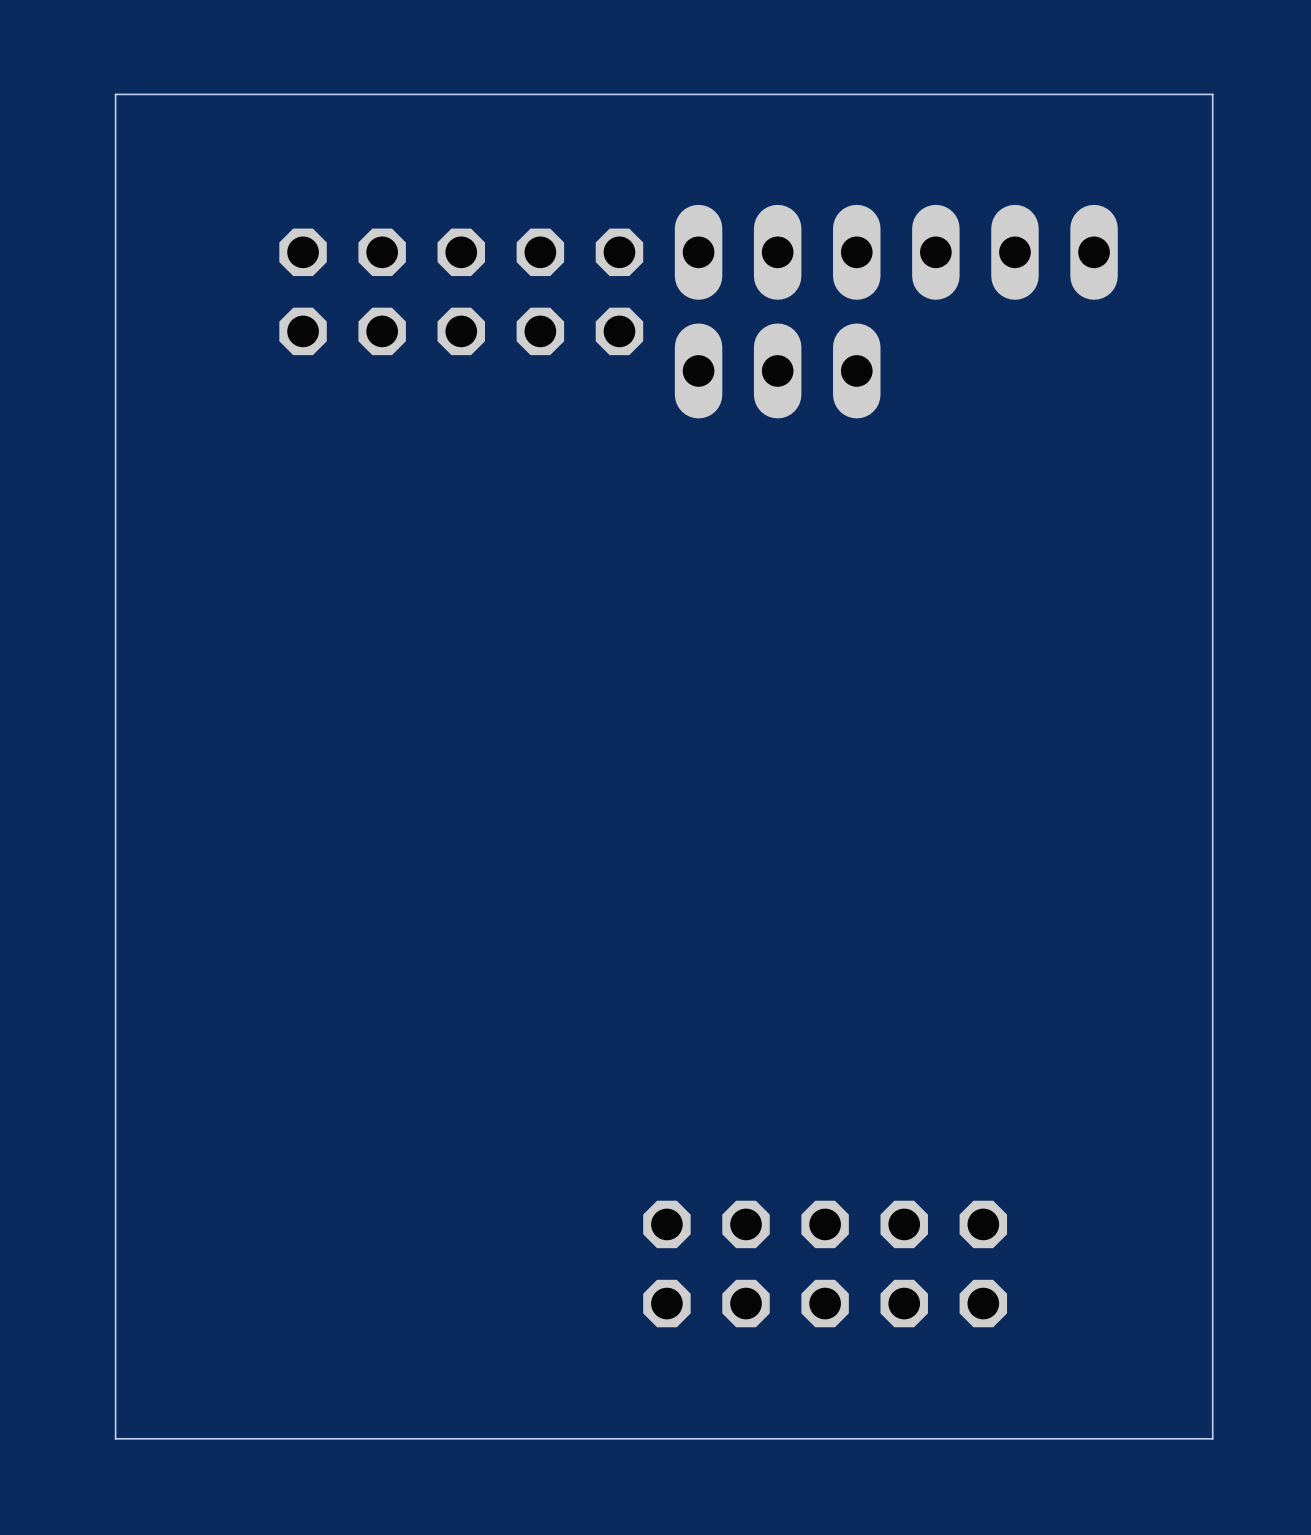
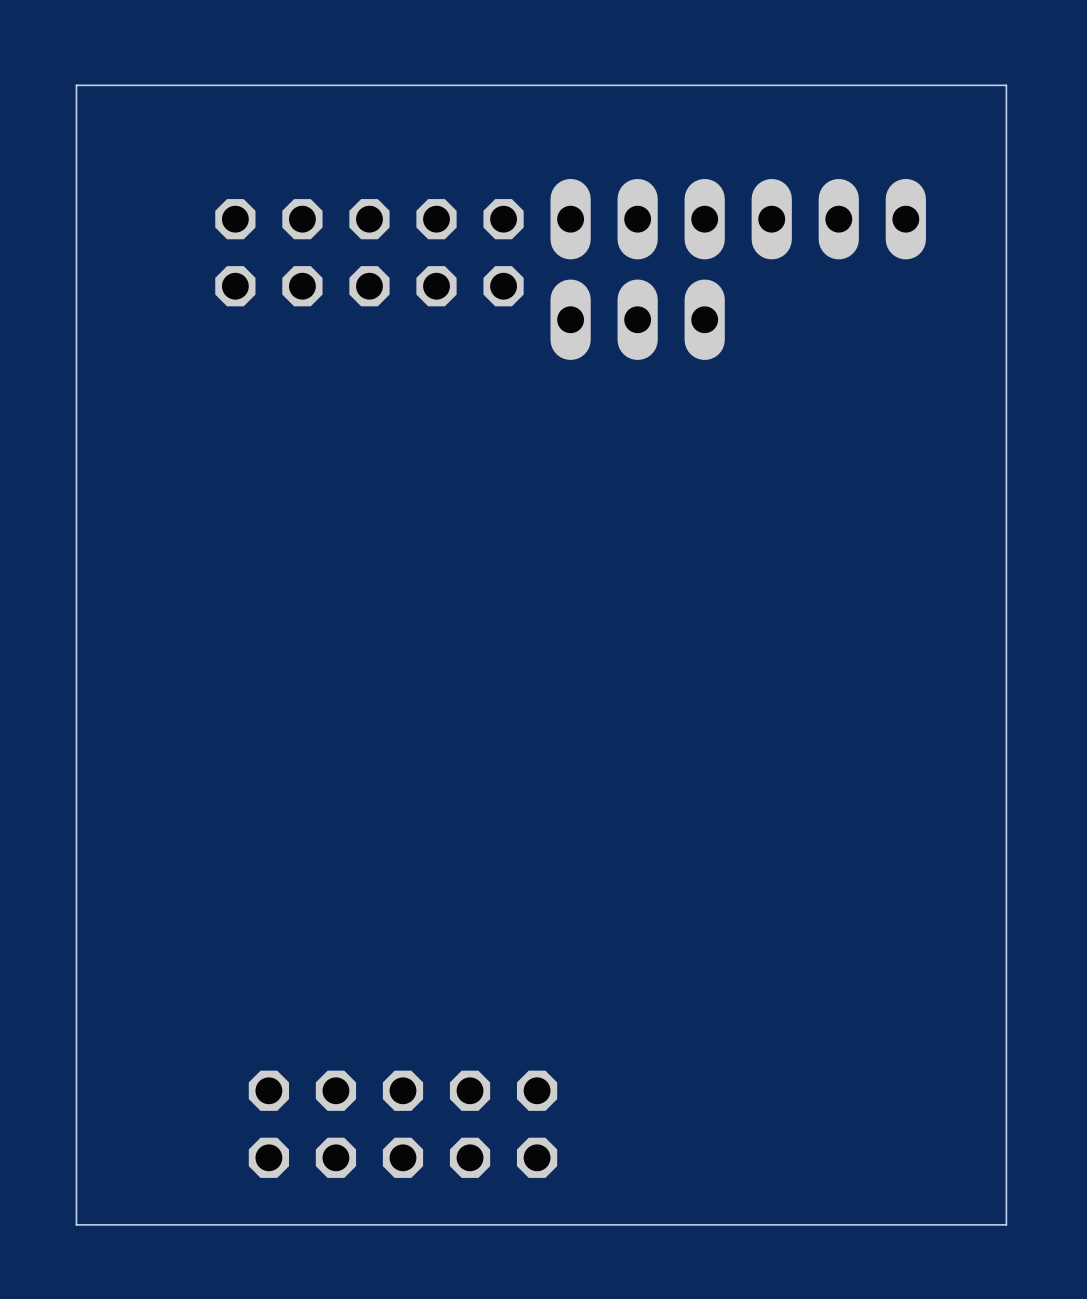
part position: (825, 1263) -> (402, 1124)

